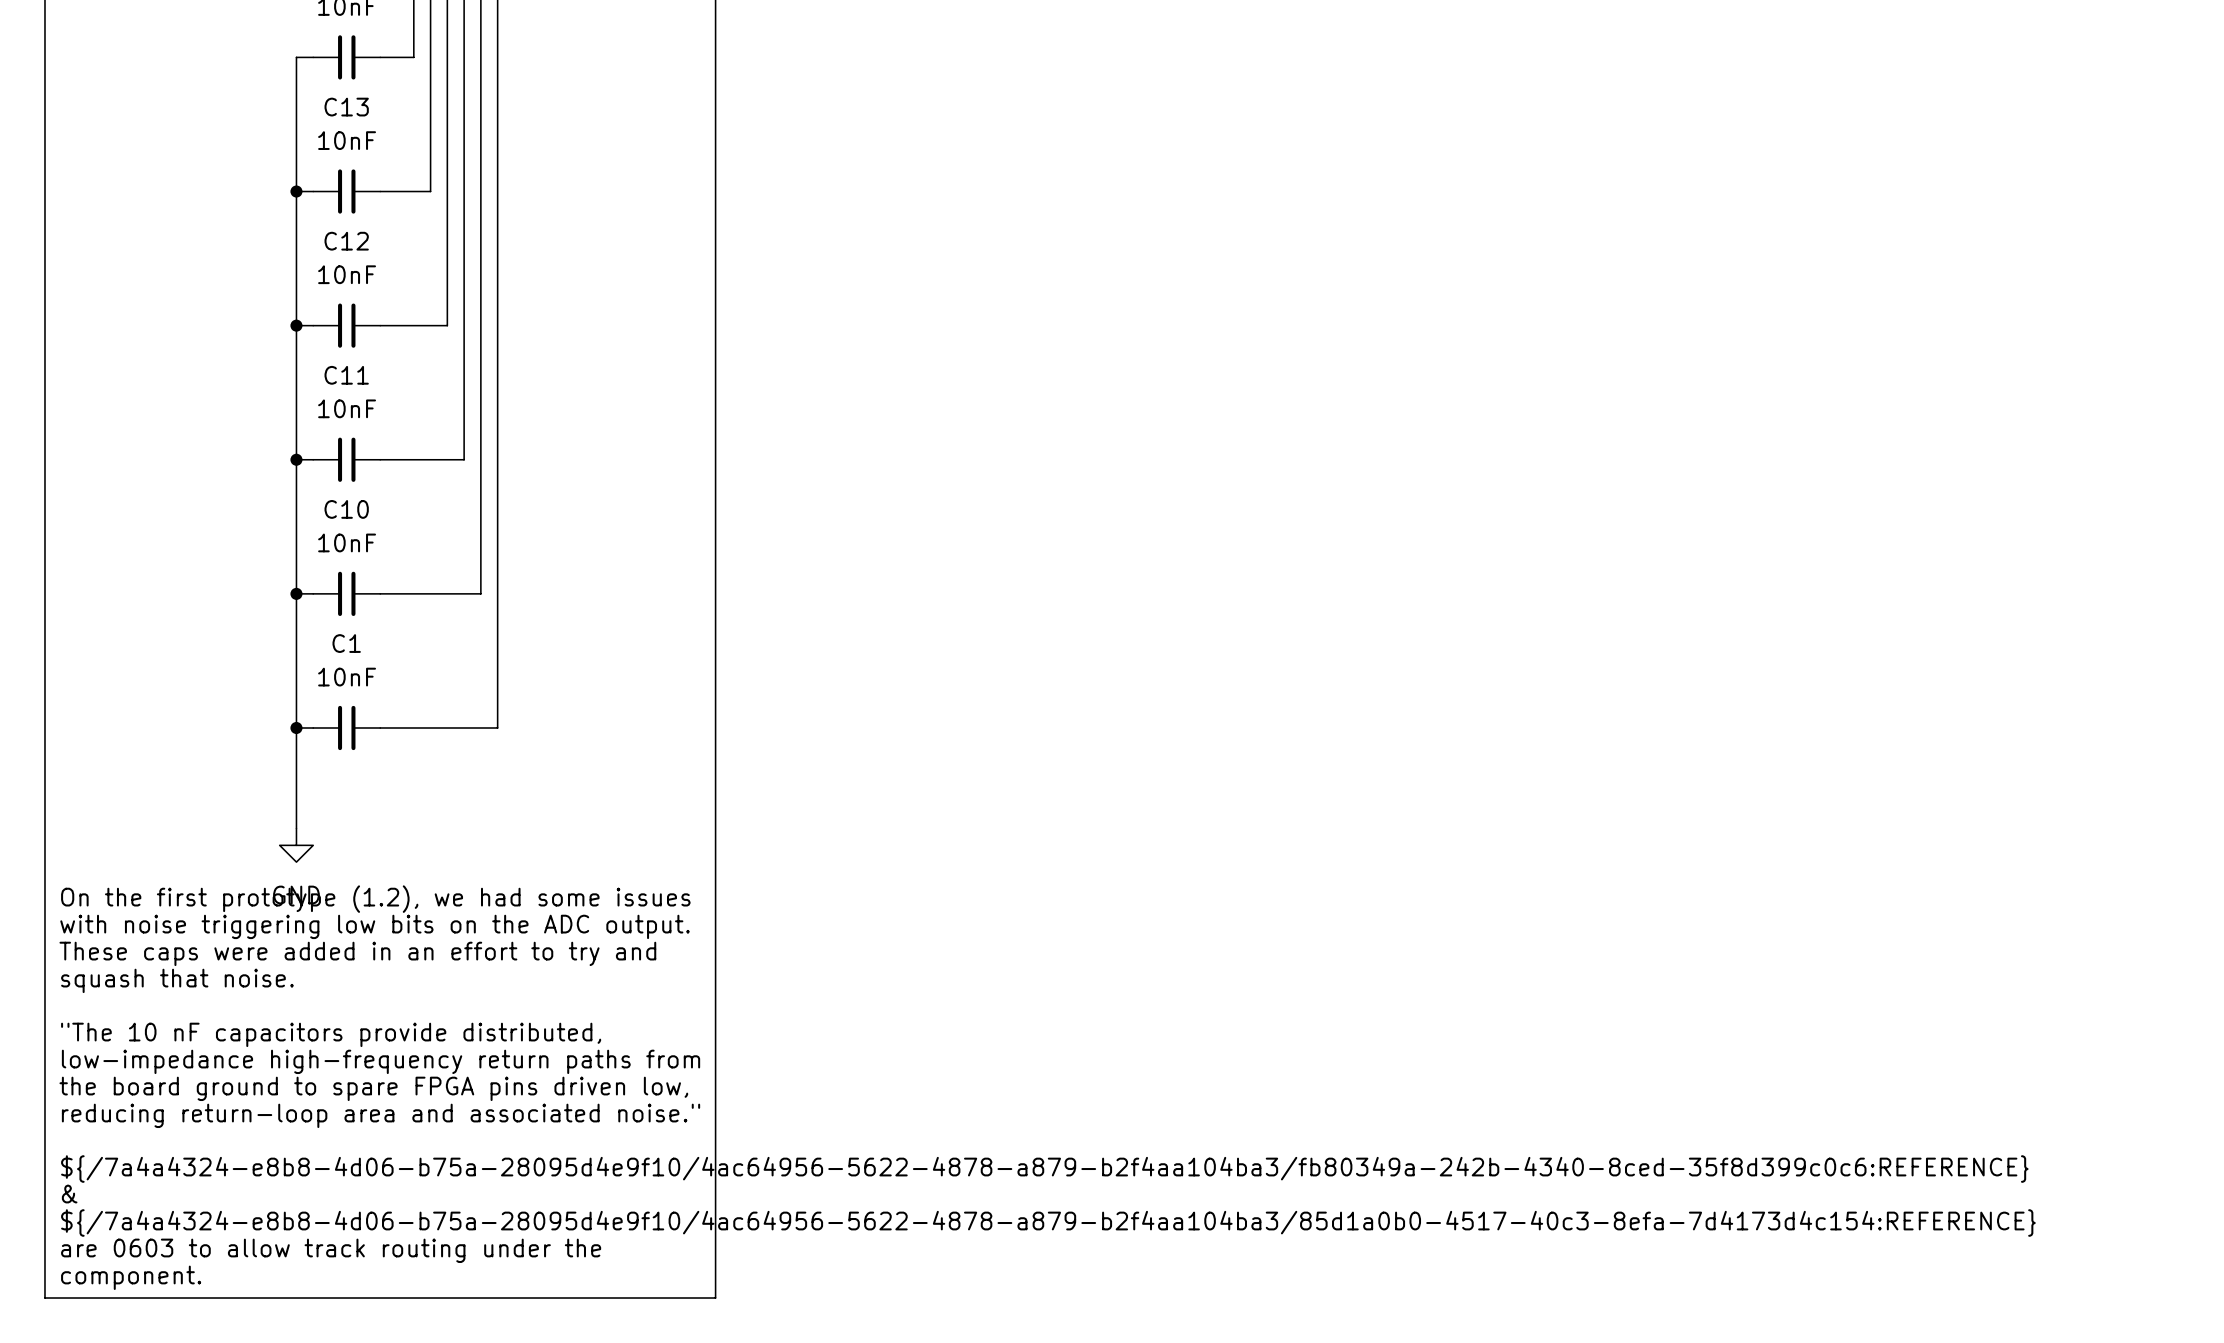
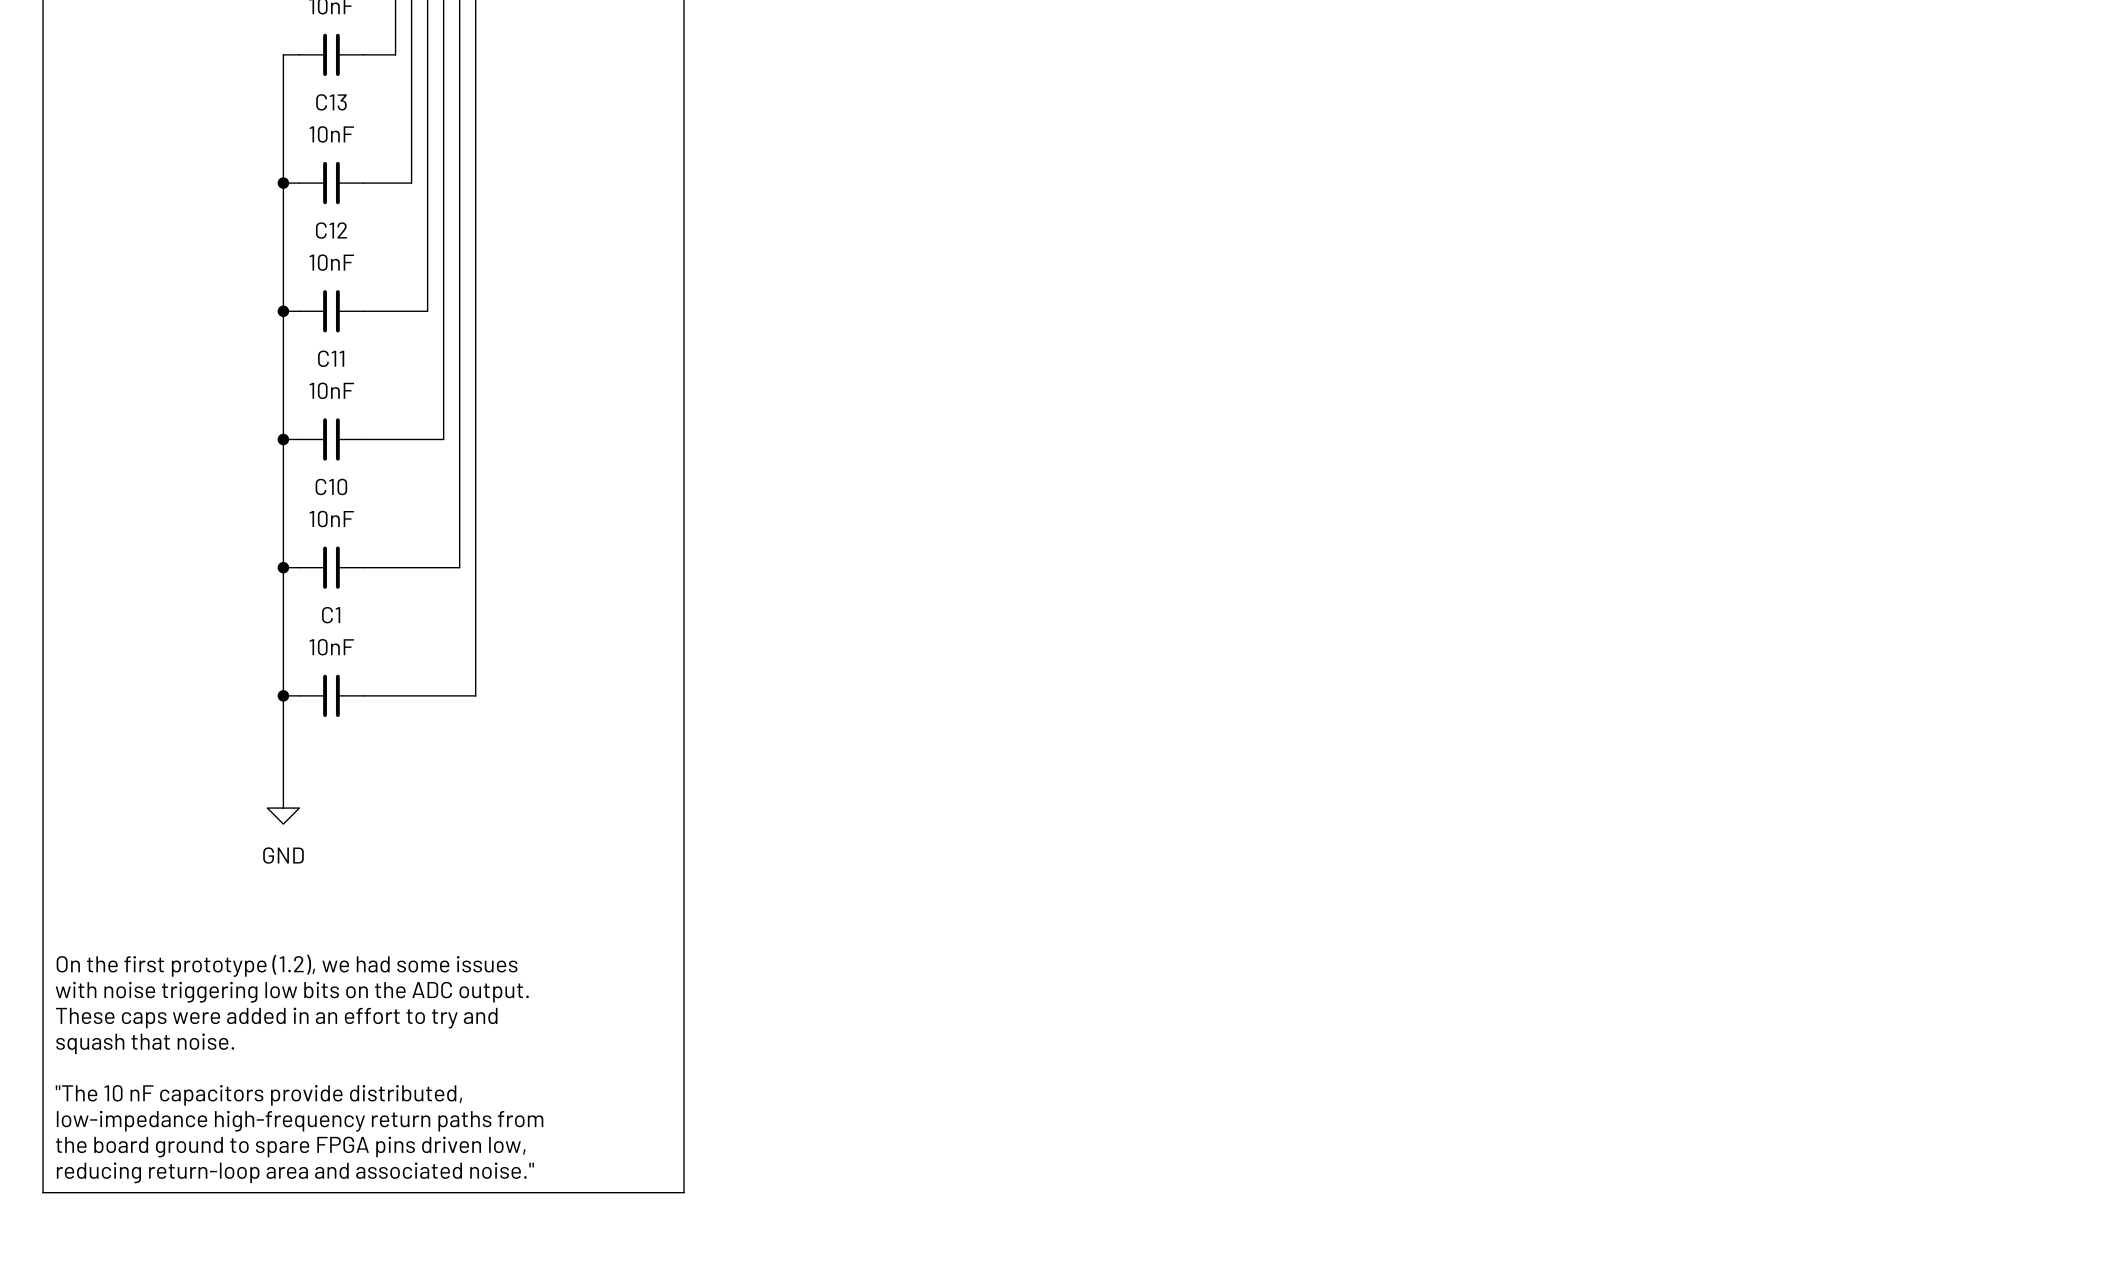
text position: On the first prototype (1.2), we had some issues (375, 899) -> On the first prototype (1.2), we had some issues (287, 965)
text position: with noise triggering low bits on the ADC output. (375, 926) -> with noise triggering low bits on the ADC output. (292, 992)
text position: These caps were added in an effort to try and (357, 953) -> These caps were added in an effort to try and (276, 1018)
text position: squash that noise. (177, 980) -> squash that noise. (145, 1043)
text position: "The 10 nF capacitors provide distributed, (331, 1034) -> "The 10 nF capacitors provide distributed, (258, 1095)
text position: low-impedance high-frequency return paths from (381, 1061) -> low-impedance high-frequency return paths from (300, 1121)
text position: the board ground to spare FPGA pins driven low, (373, 1088) -> the board ground to spare FPGA pins driven low, (290, 1147)
text position: reducing return-loop area and associated noise." (381, 1115) -> reducing return-loop area and associated noise." (295, 1172)
text: ${/7a4a4324-e8b8-4d06-b75a-28095d4e9f10/4ac64956-5622-4878-a879-b2f4aa104ba3/fb80349a-242b-4340-8ced-35f8d399c0c6:REFERENCE} (1044, 1169) -> none
text: & (69, 1194) -> none
text: ${/7a4a4324-e8b8-4d06-b75a-28095d4e9f10/4ac64956-5622-4878-a879-b2f4aa104ba3/85d1a0b0-4517-40c3-8efa-7d4173d4c154:REFERENCE} (1048, 1223) -> none
line: (44, 1247) (44, 1298) (715, 1298) (715, 1247) -> (43, 1192) (684, 1192)
text: are 0603 to allow track routing under the (331, 1250) -> none
text: component. (131, 1277) -> none

